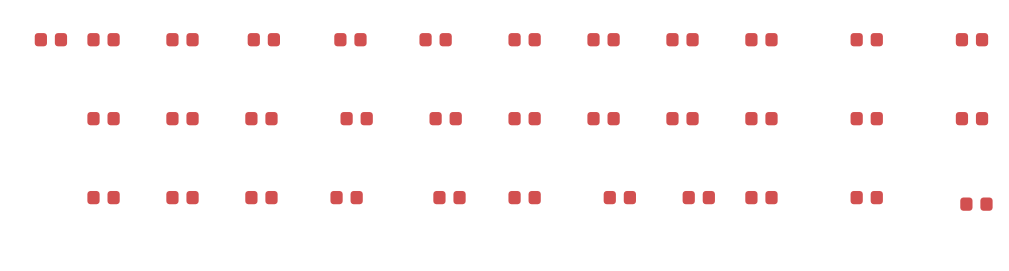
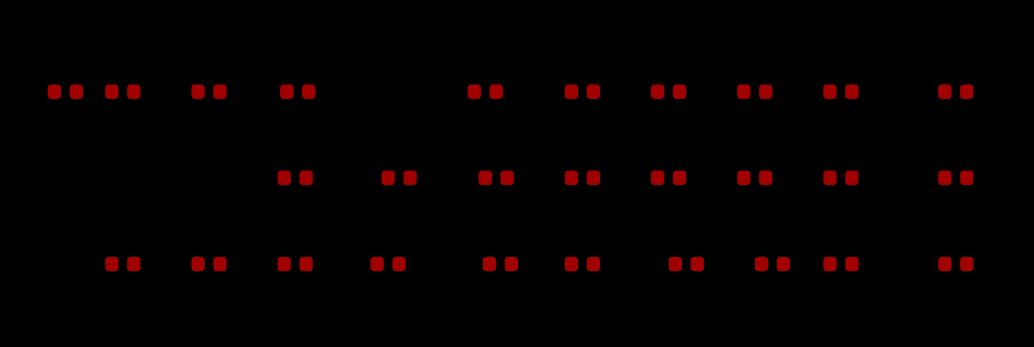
part: (350, 39) -> none
part: (103, 118) -> none
part: (182, 118) -> none

